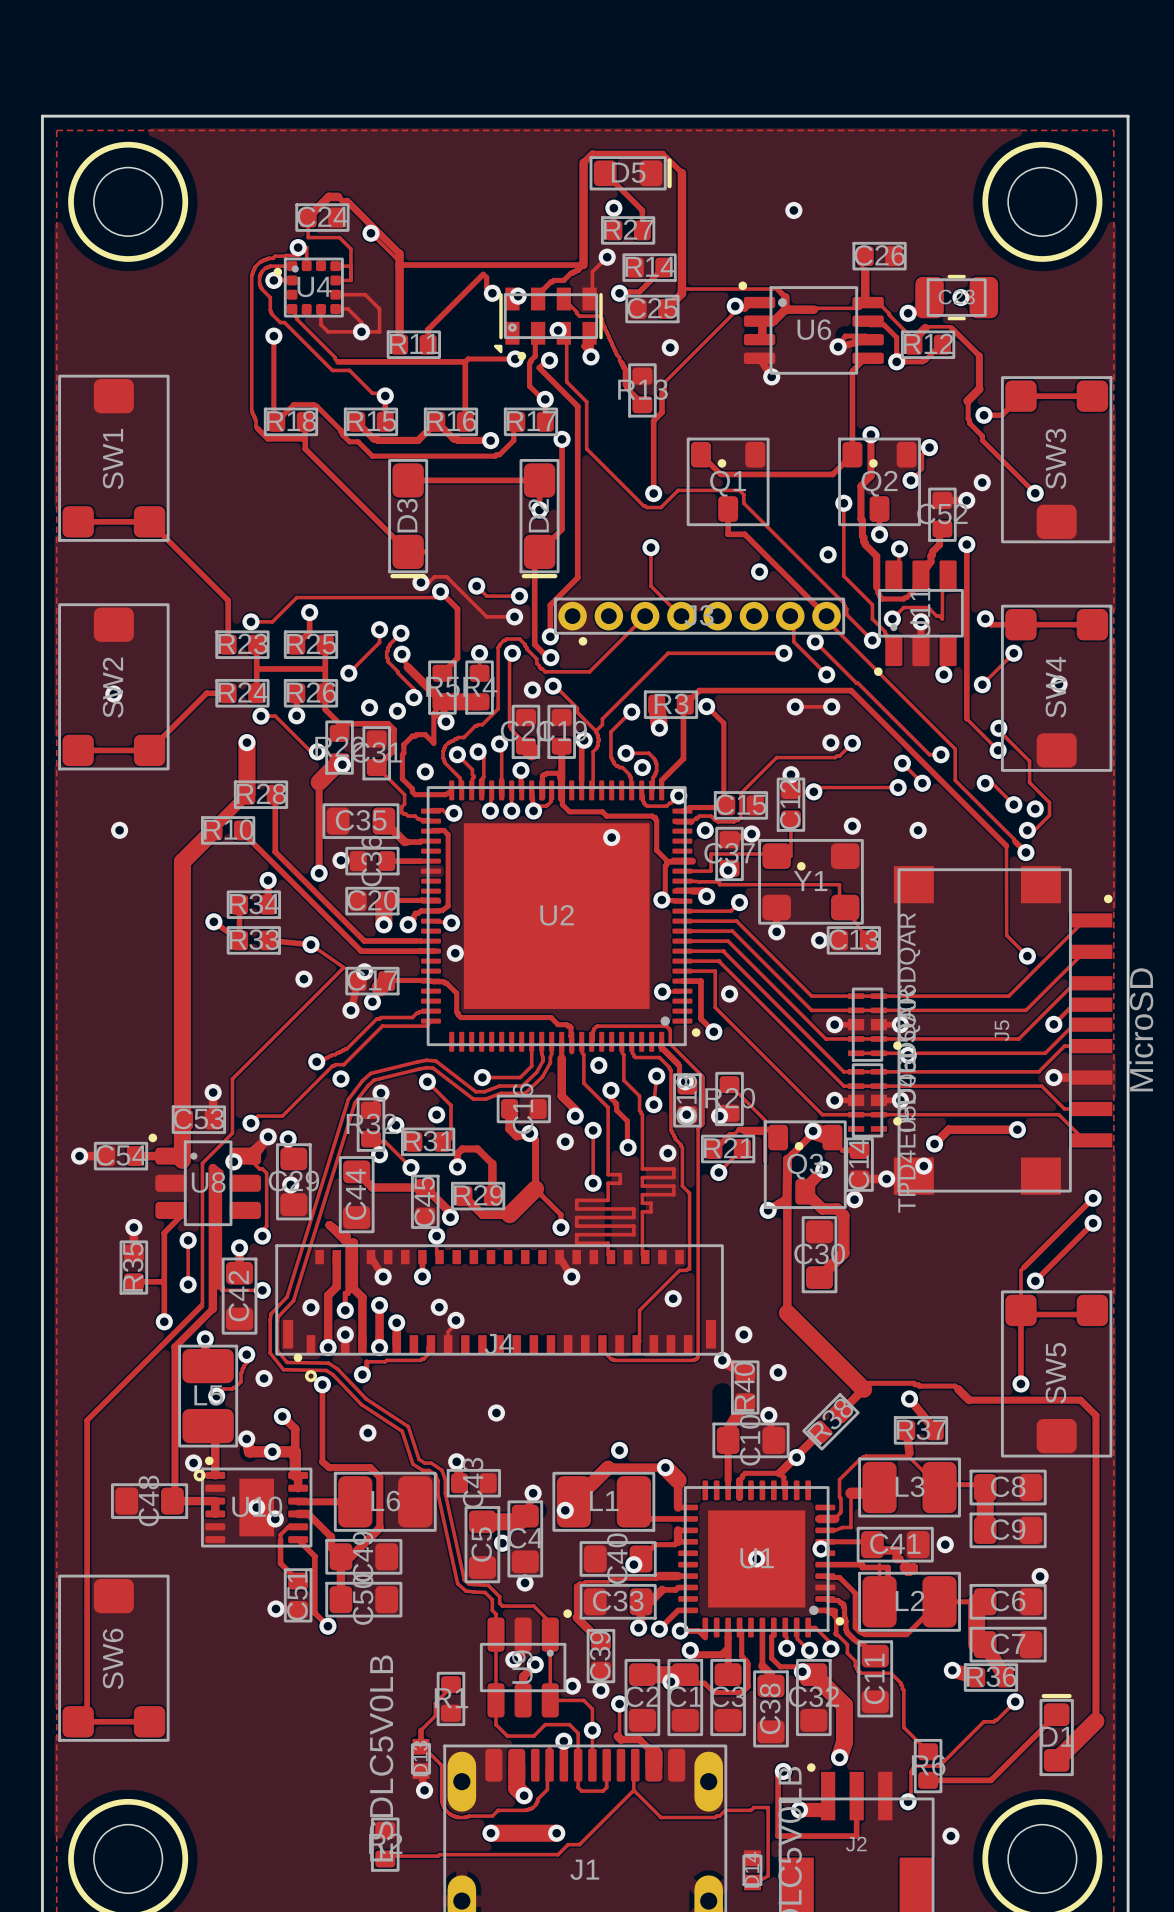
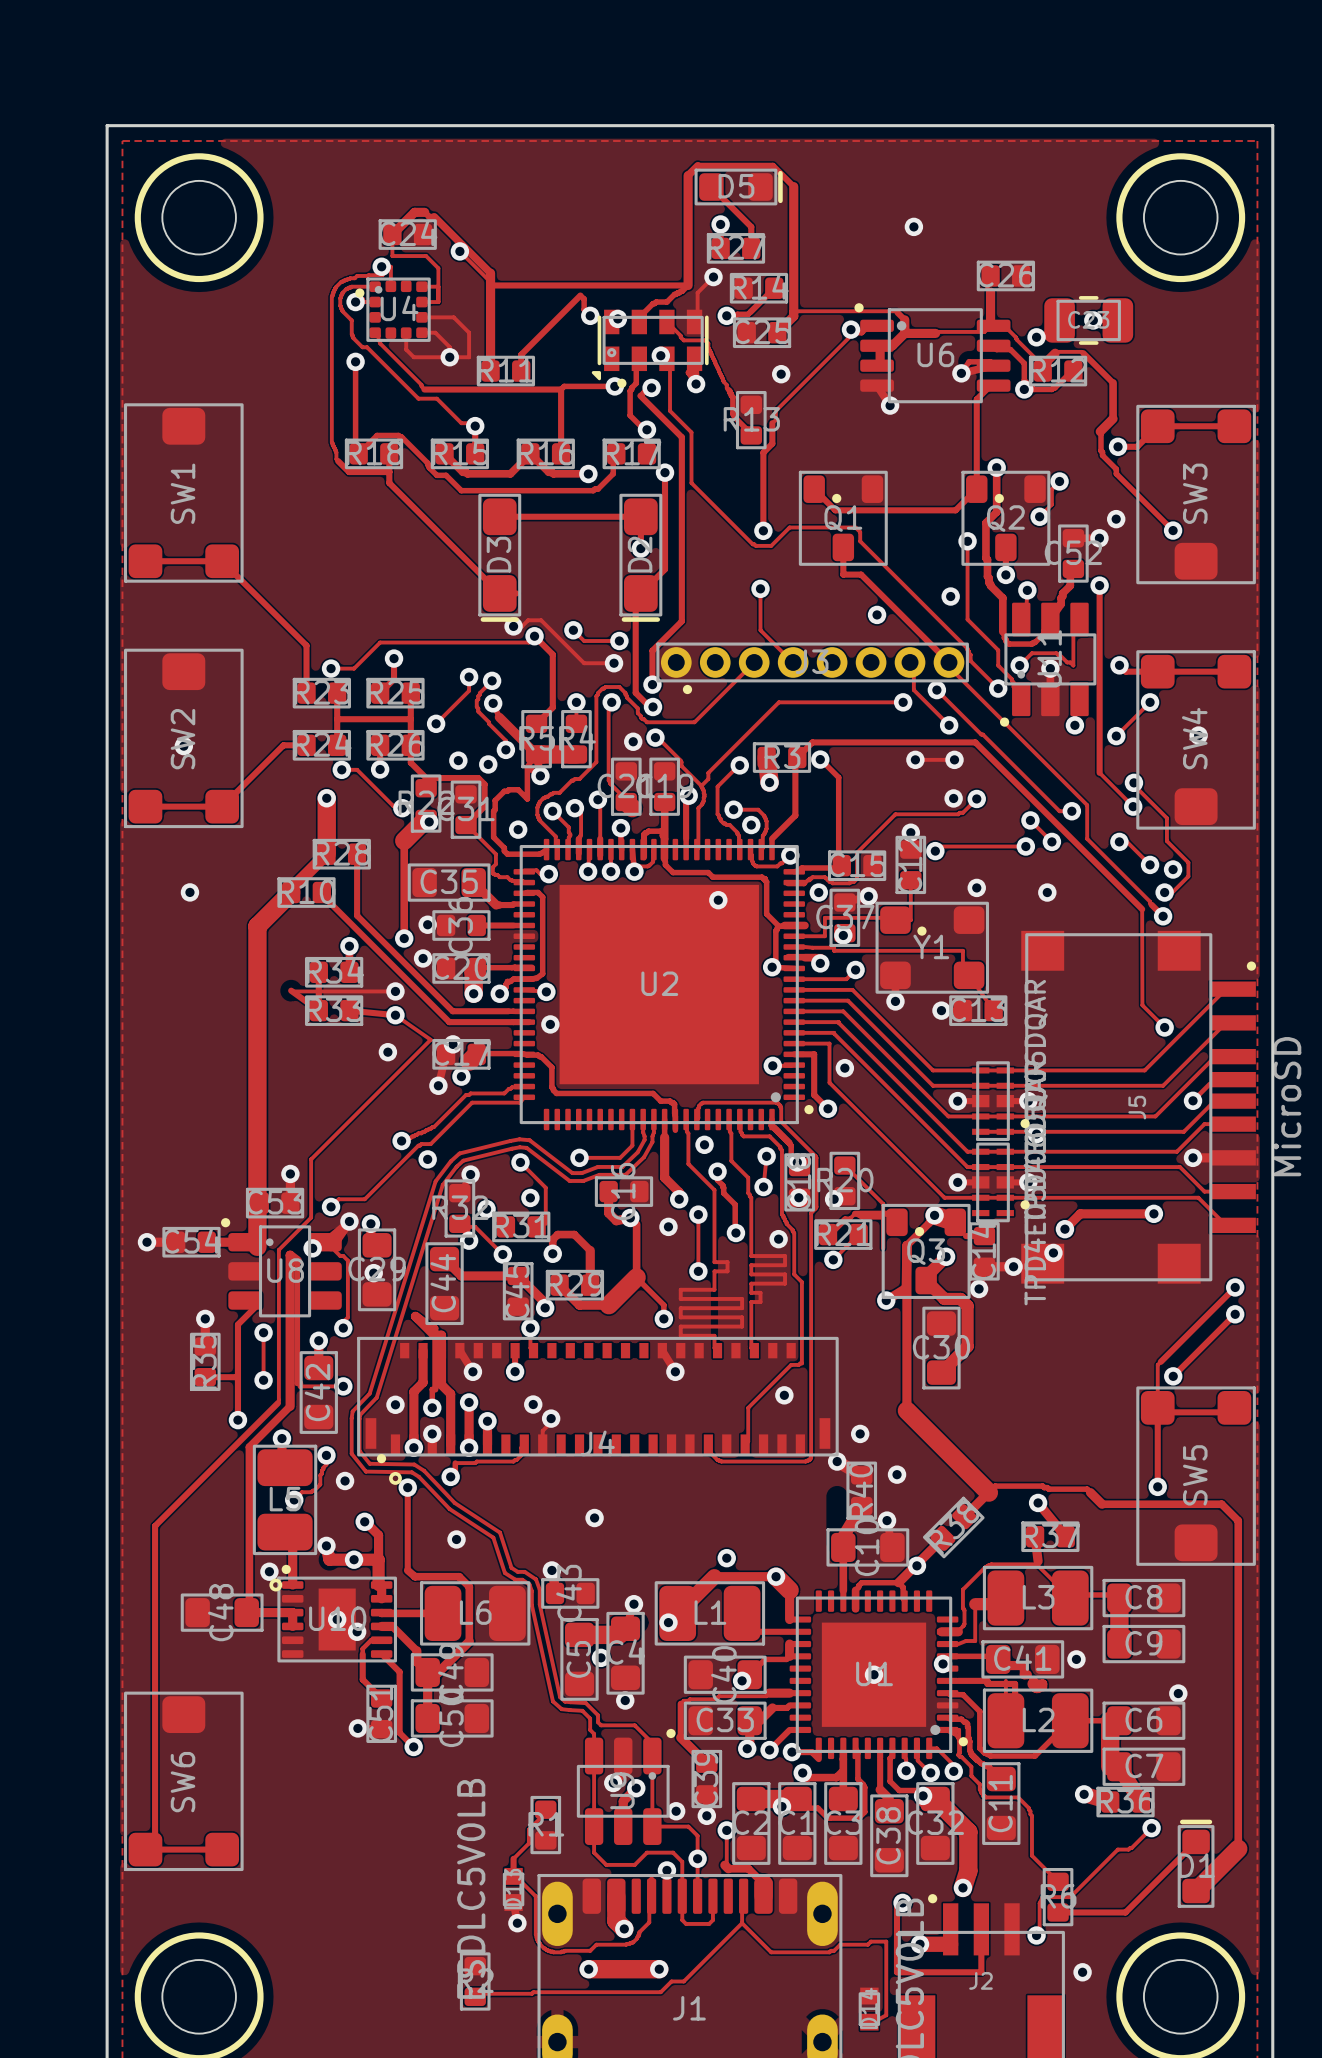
via: none -> (423, 958)
track: none -> (291, 990) (395, 991)
via: (213, 921) -> none
via: none -> (395, 991)

